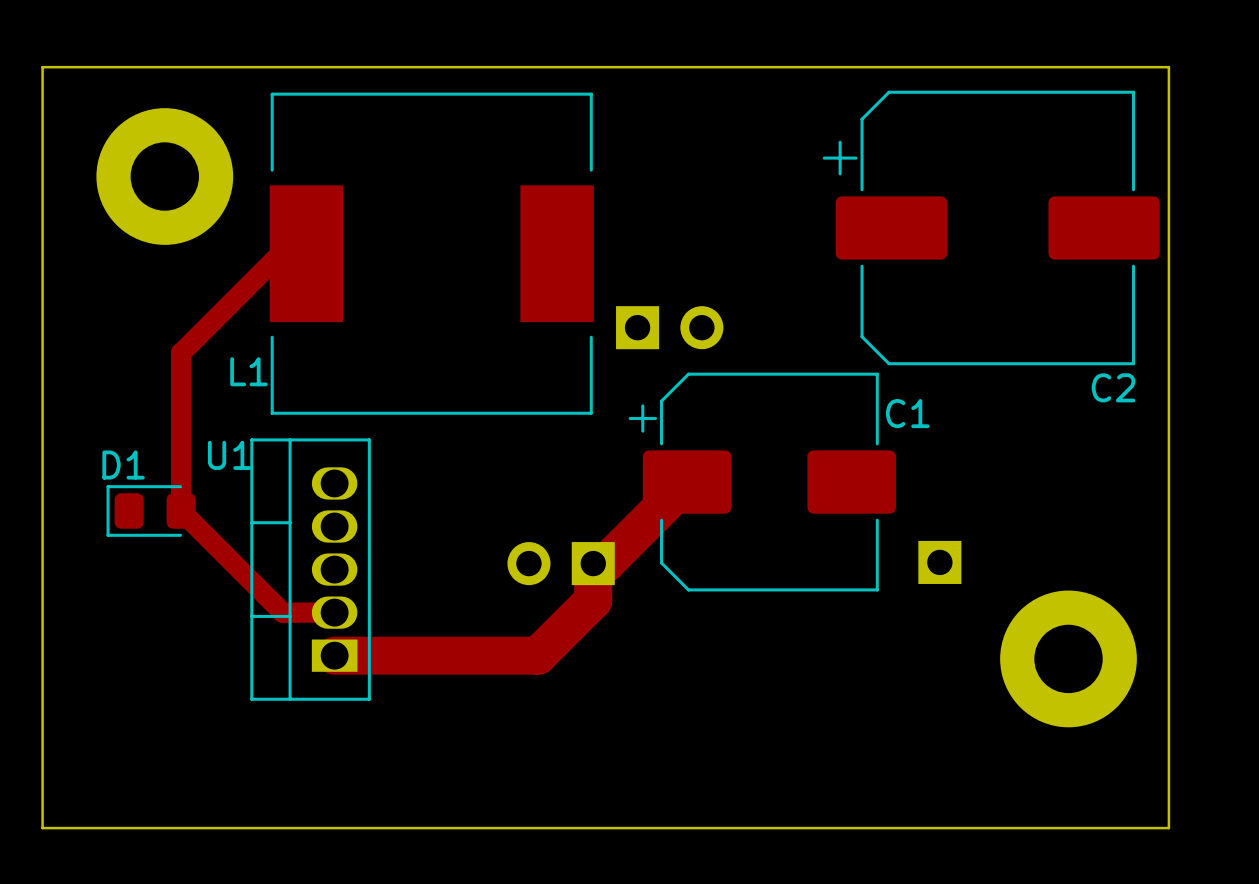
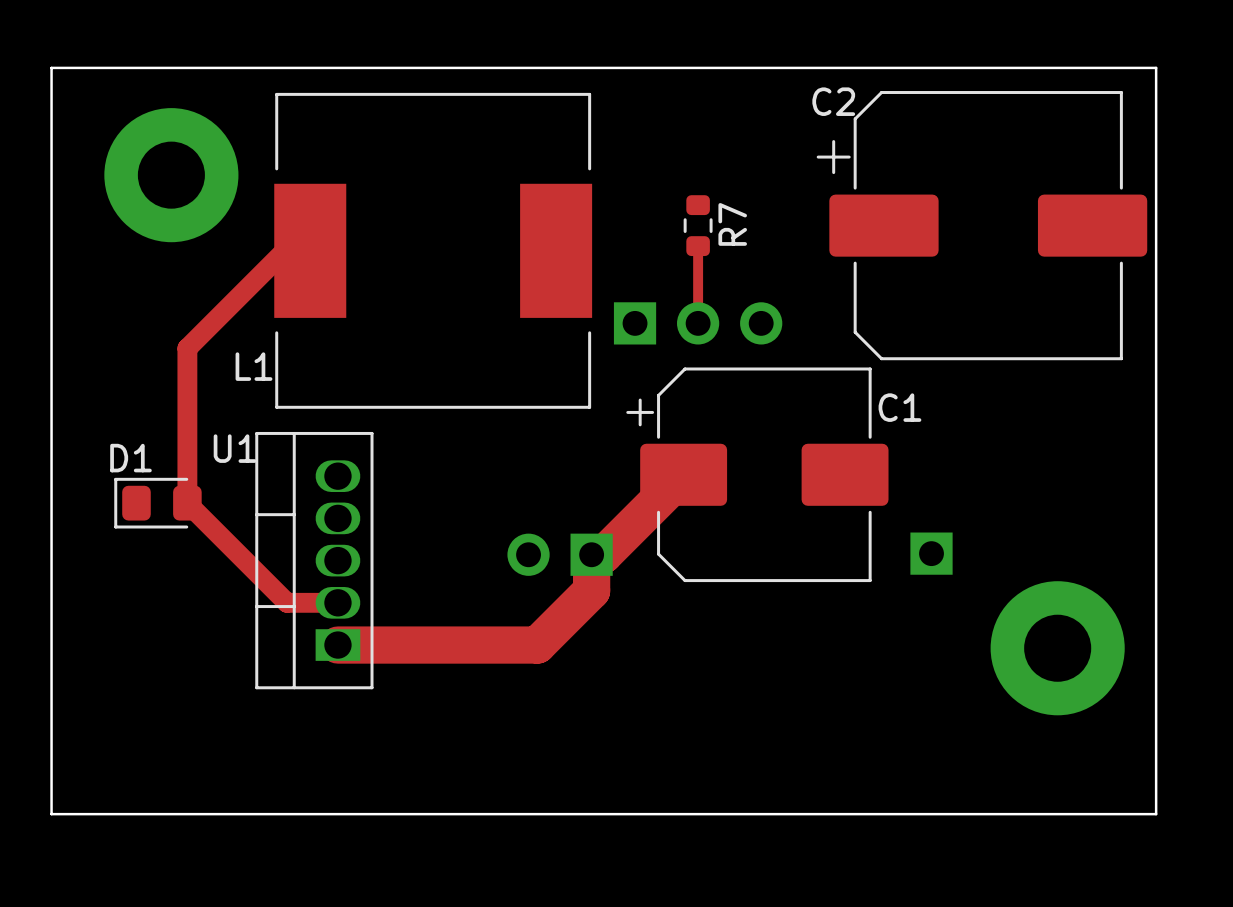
R7: none -> (698, 225)
track: none -> (698, 246) (698, 323)
part: (669, 327) -> none
part: none -> (698, 323)
C2 name position: C2 (1113, 387) -> C2 (833, 101)

